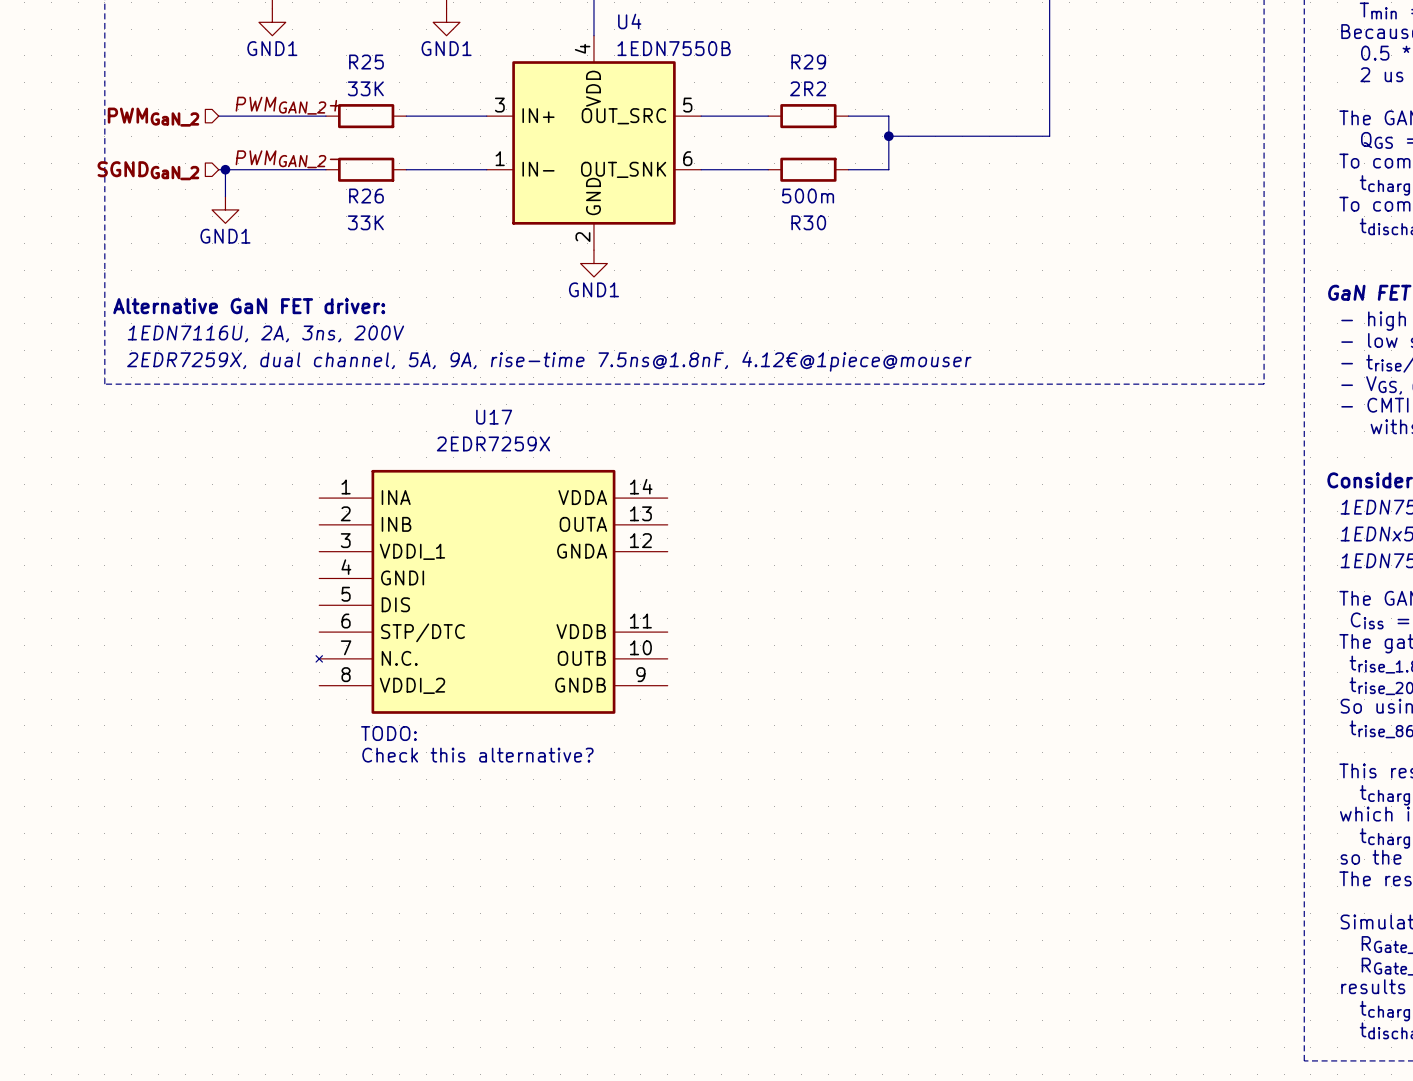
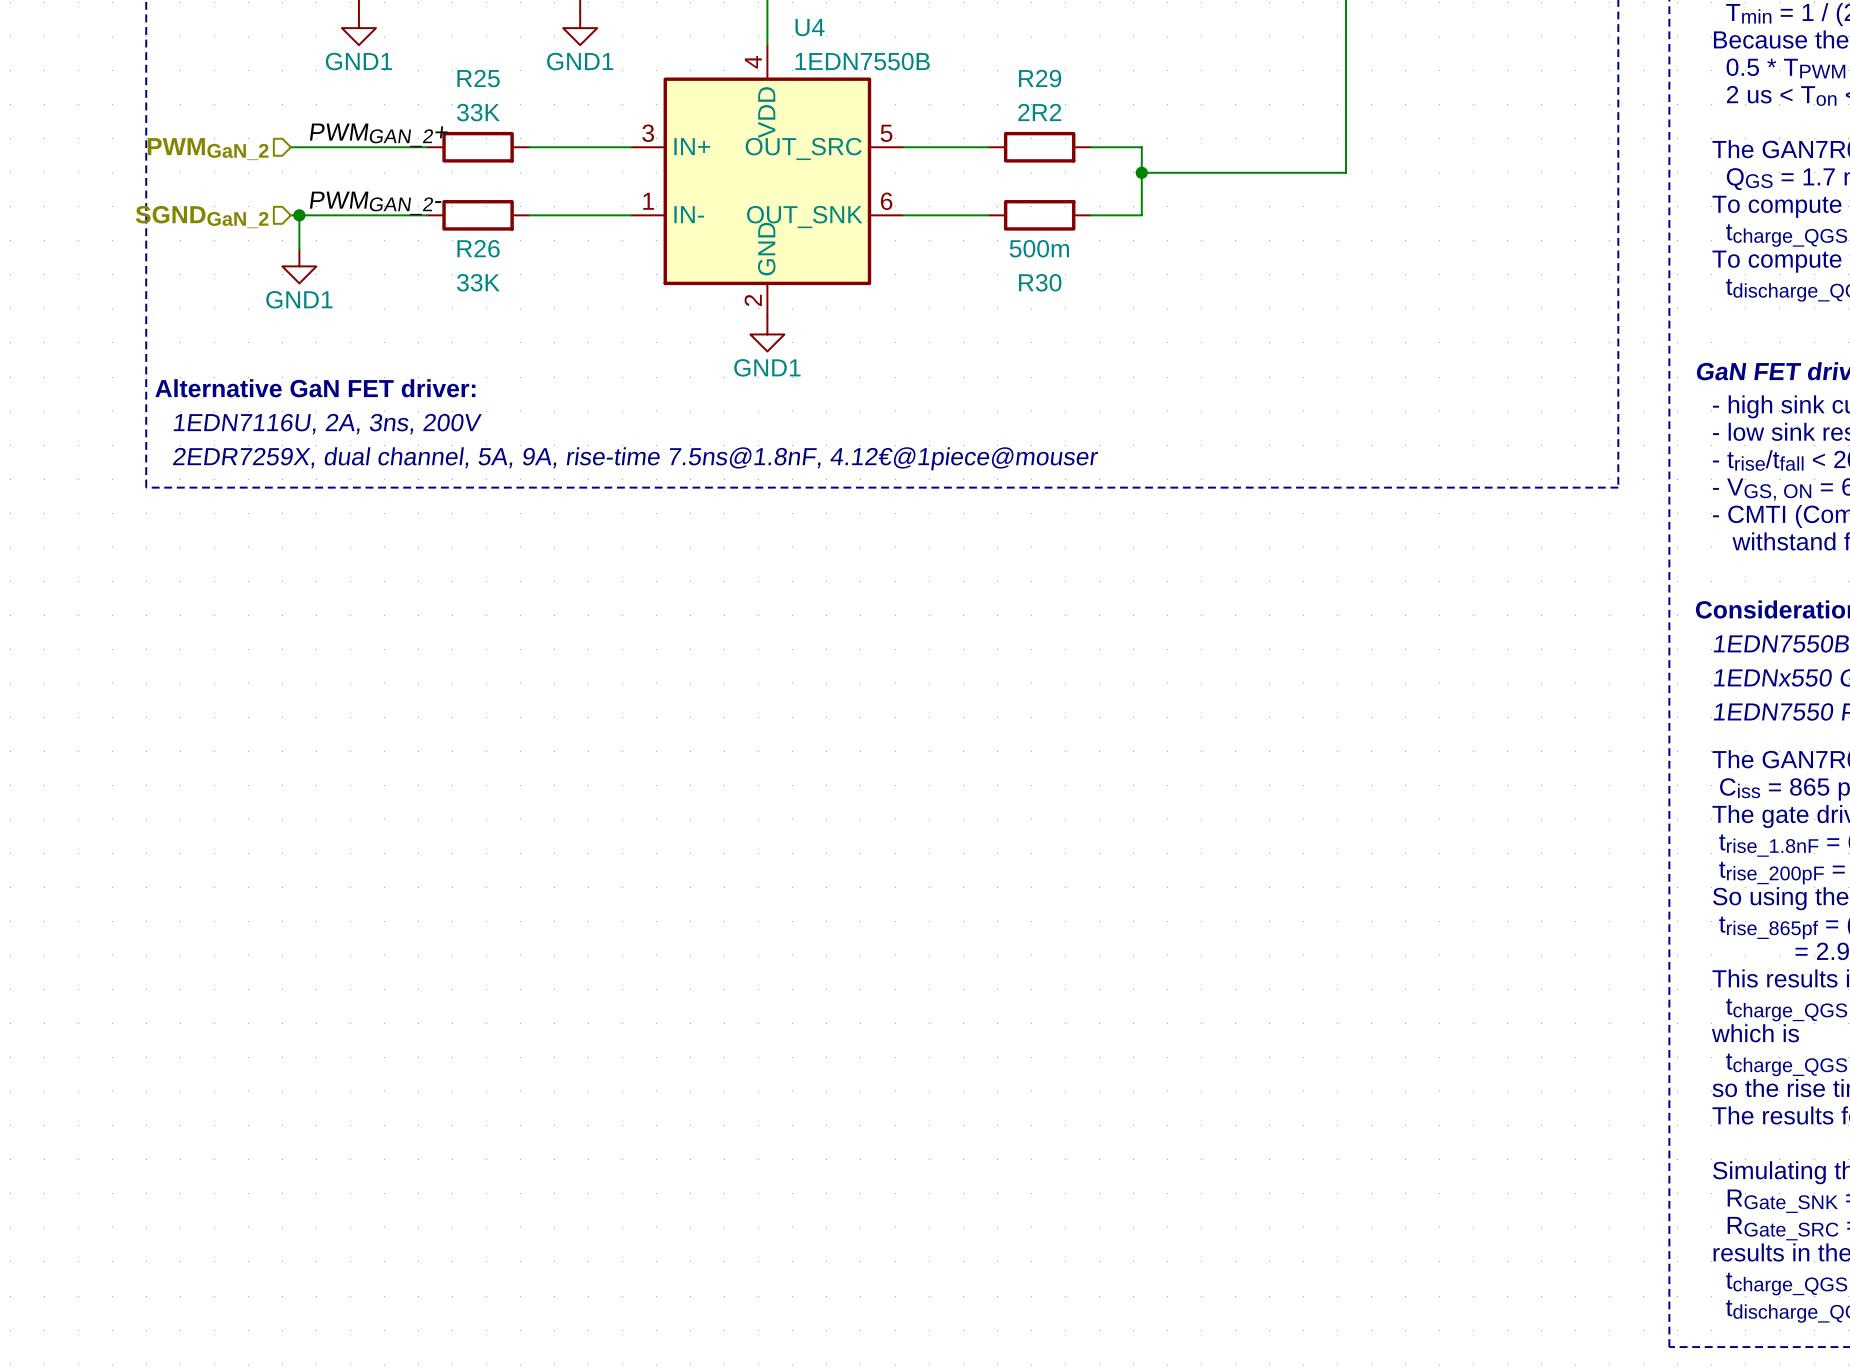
U17: 2EDR7259X (491, 591) -> none
text: TODO: (388, 733) -> none
text: Check this alternative? (477, 755) -> none

